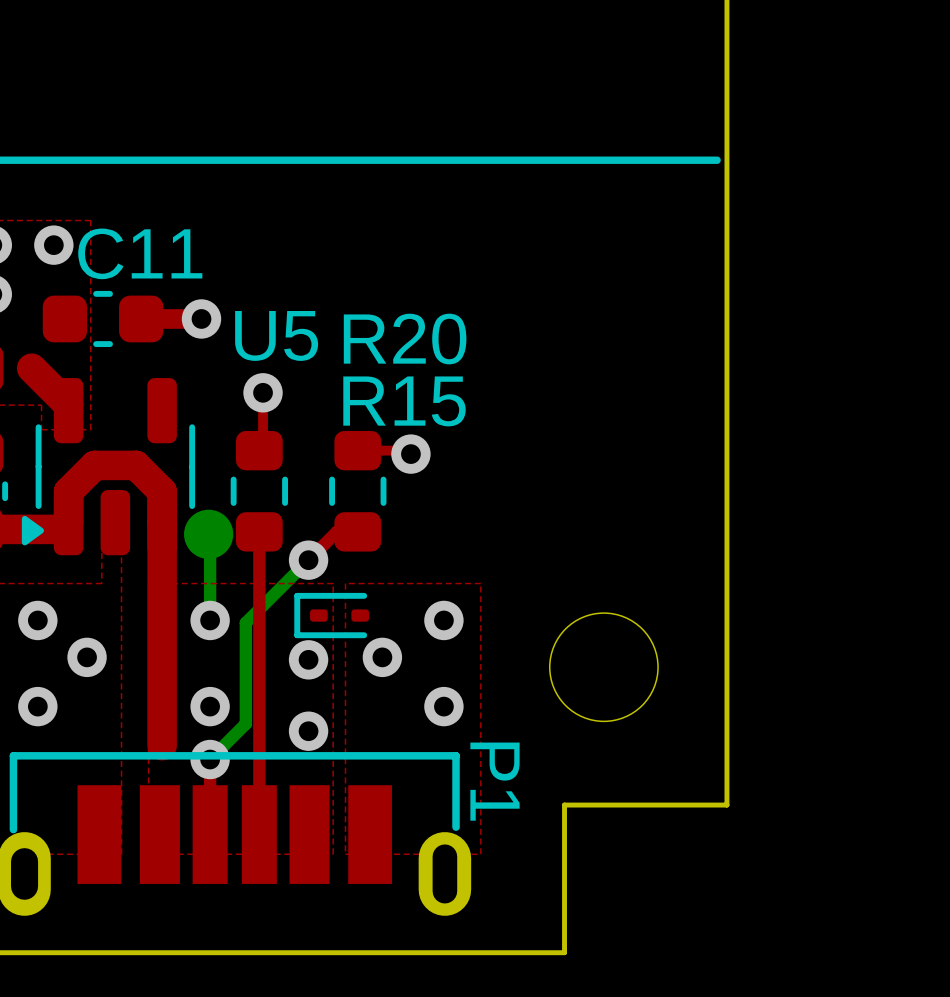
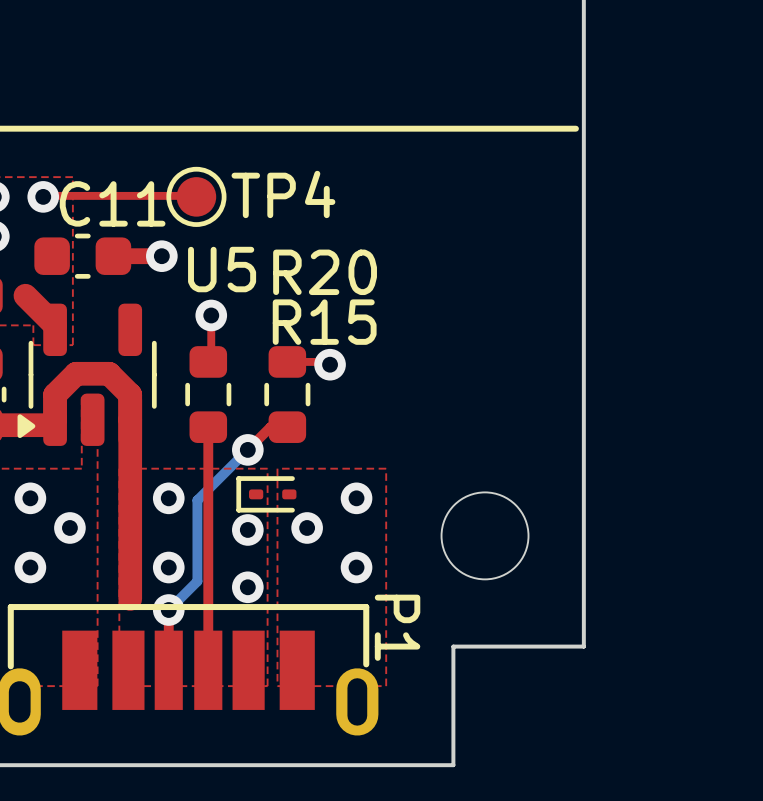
top track: none -> (44, 195) (184, 195)
TP4: none -> (196, 196)
part: (208, 534) -> none
bottom track: (208, 548) (210, 620) -> none

